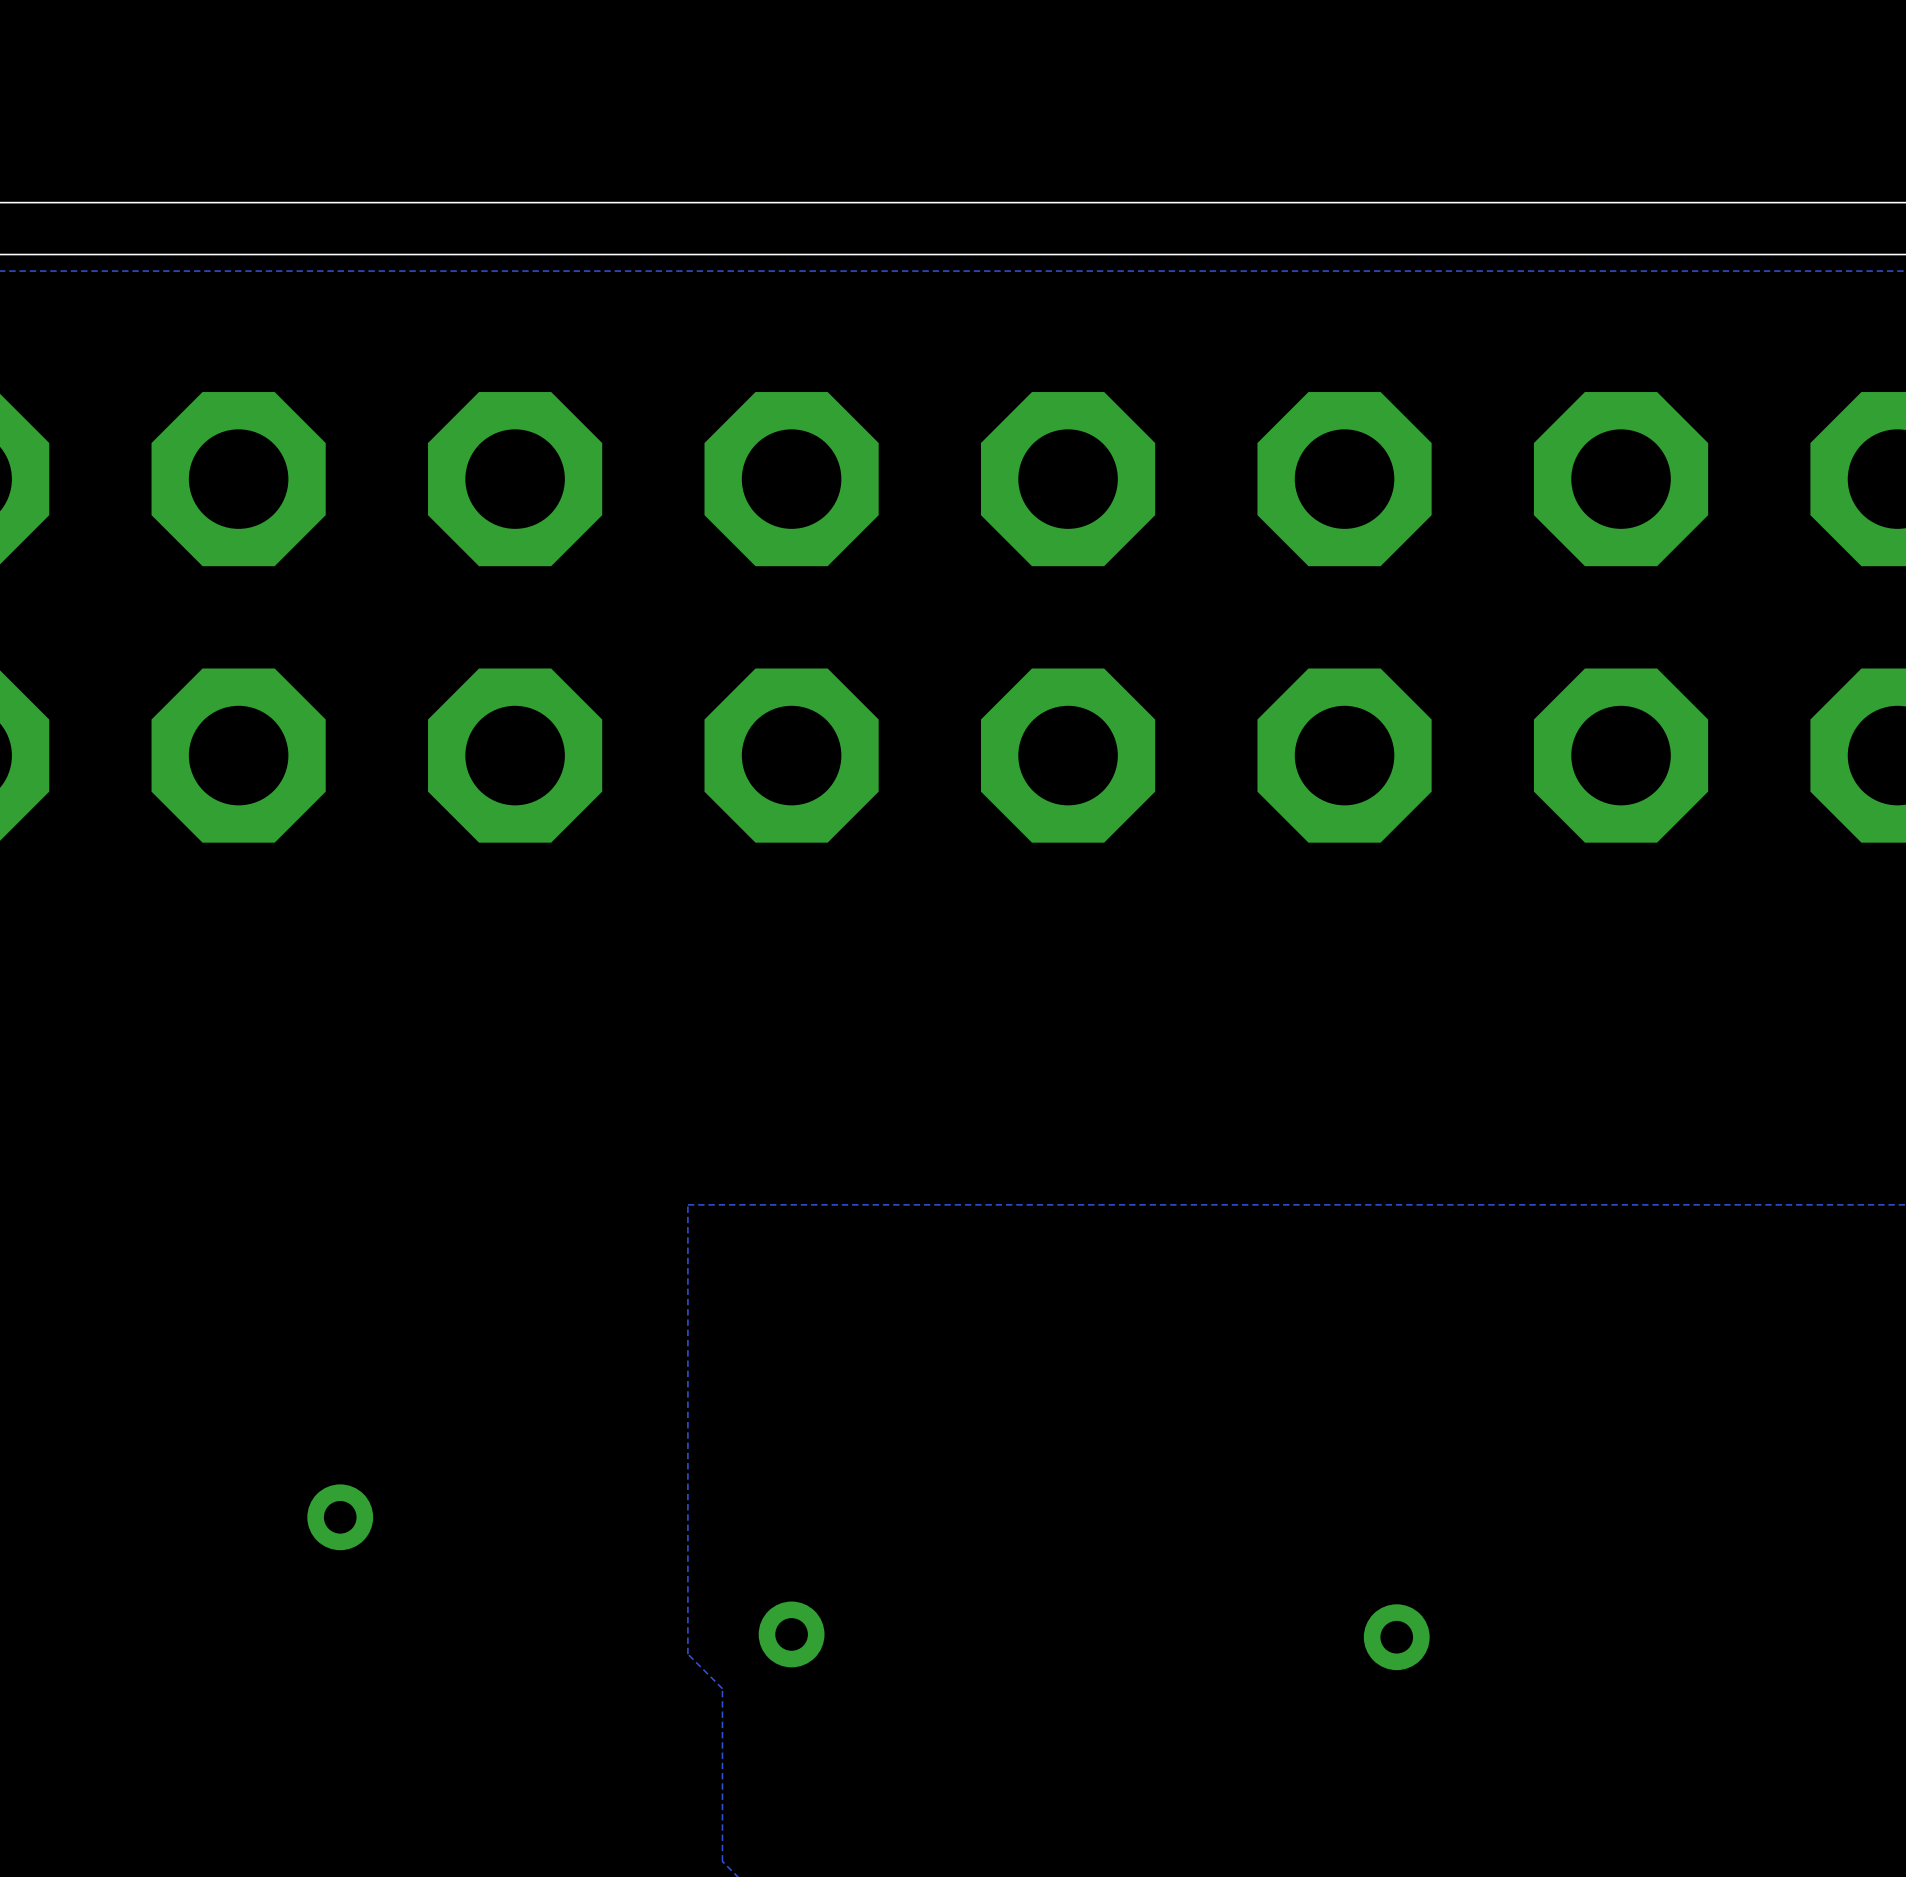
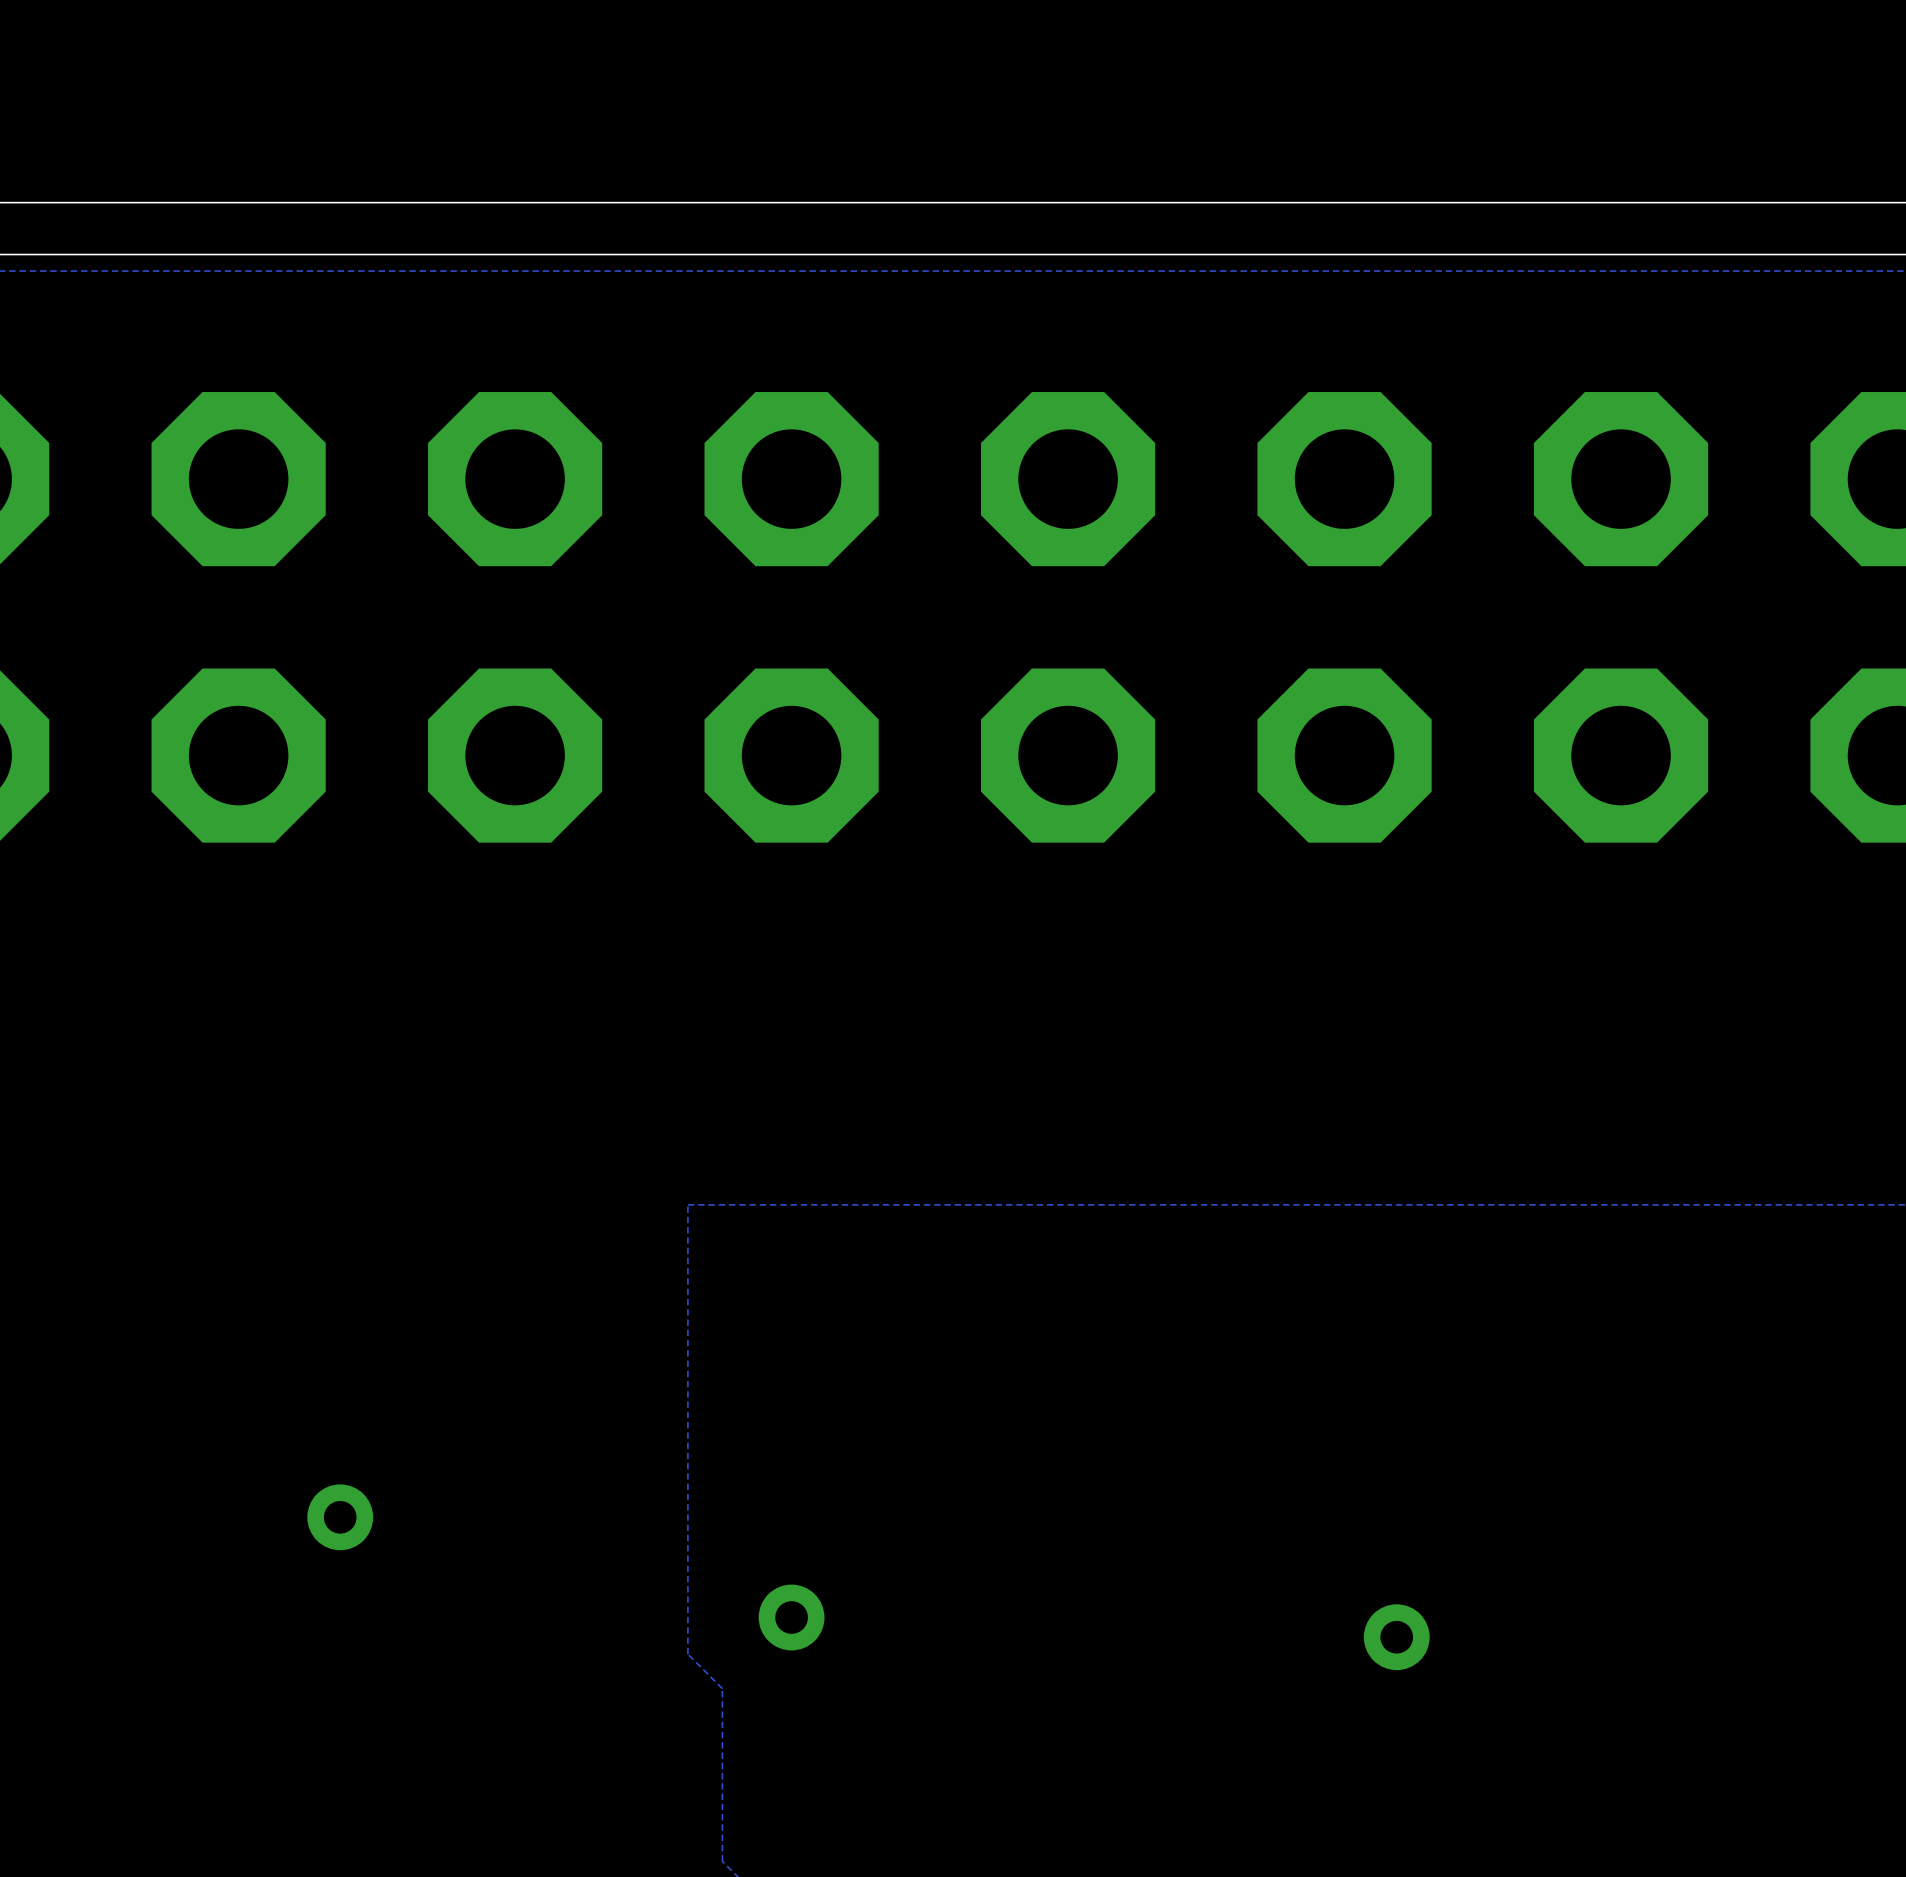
via position: (791, 1634) -> (791, 1617)

